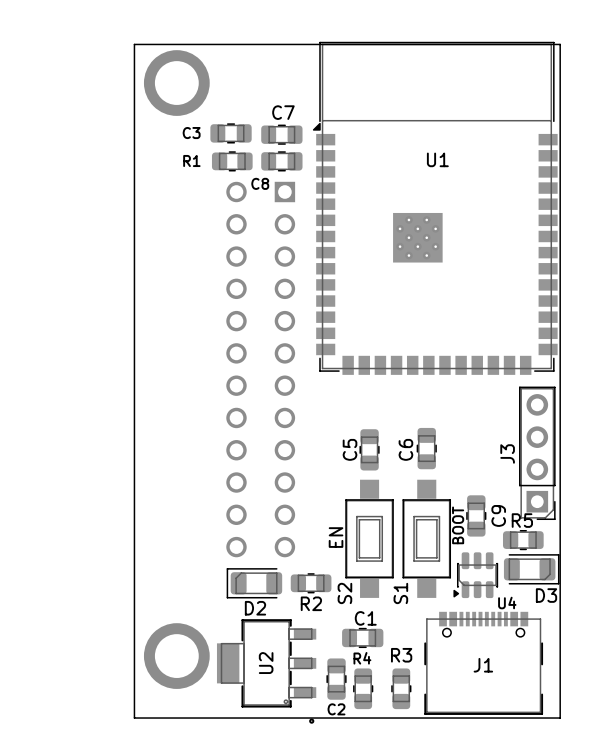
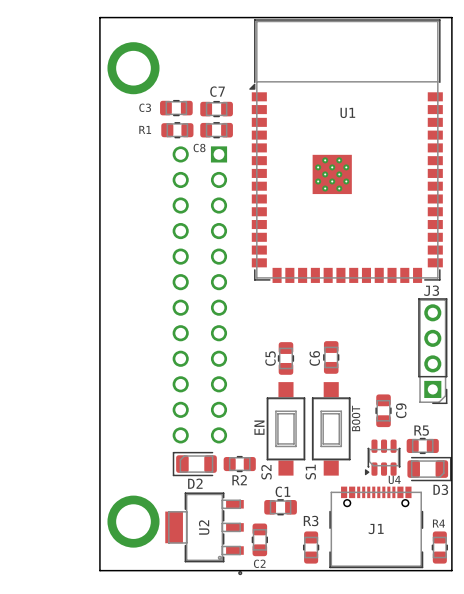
board edge: (134, 44) (560, 44) (560, 718) -> (99, 37) (99, 17) (451, 17) (451, 570) (436, 570)
U1 position: (435, 208) -> (346, 151)
J3 name rotation: 0° (507, 453) -> 90° clockwise (431, 290)
J3 name position: J3 (507, 453) -> J3 (431, 290)
J3 position: (537, 453) -> (432, 351)
C9 position: (476, 515) -> (383, 410)
R5 position: (523, 540) -> (422, 445)
D3 position: (531, 569) -> (429, 469)
U4 position: (475, 575) -> (382, 457)
R4 position: (363, 688) -> (439, 547)

